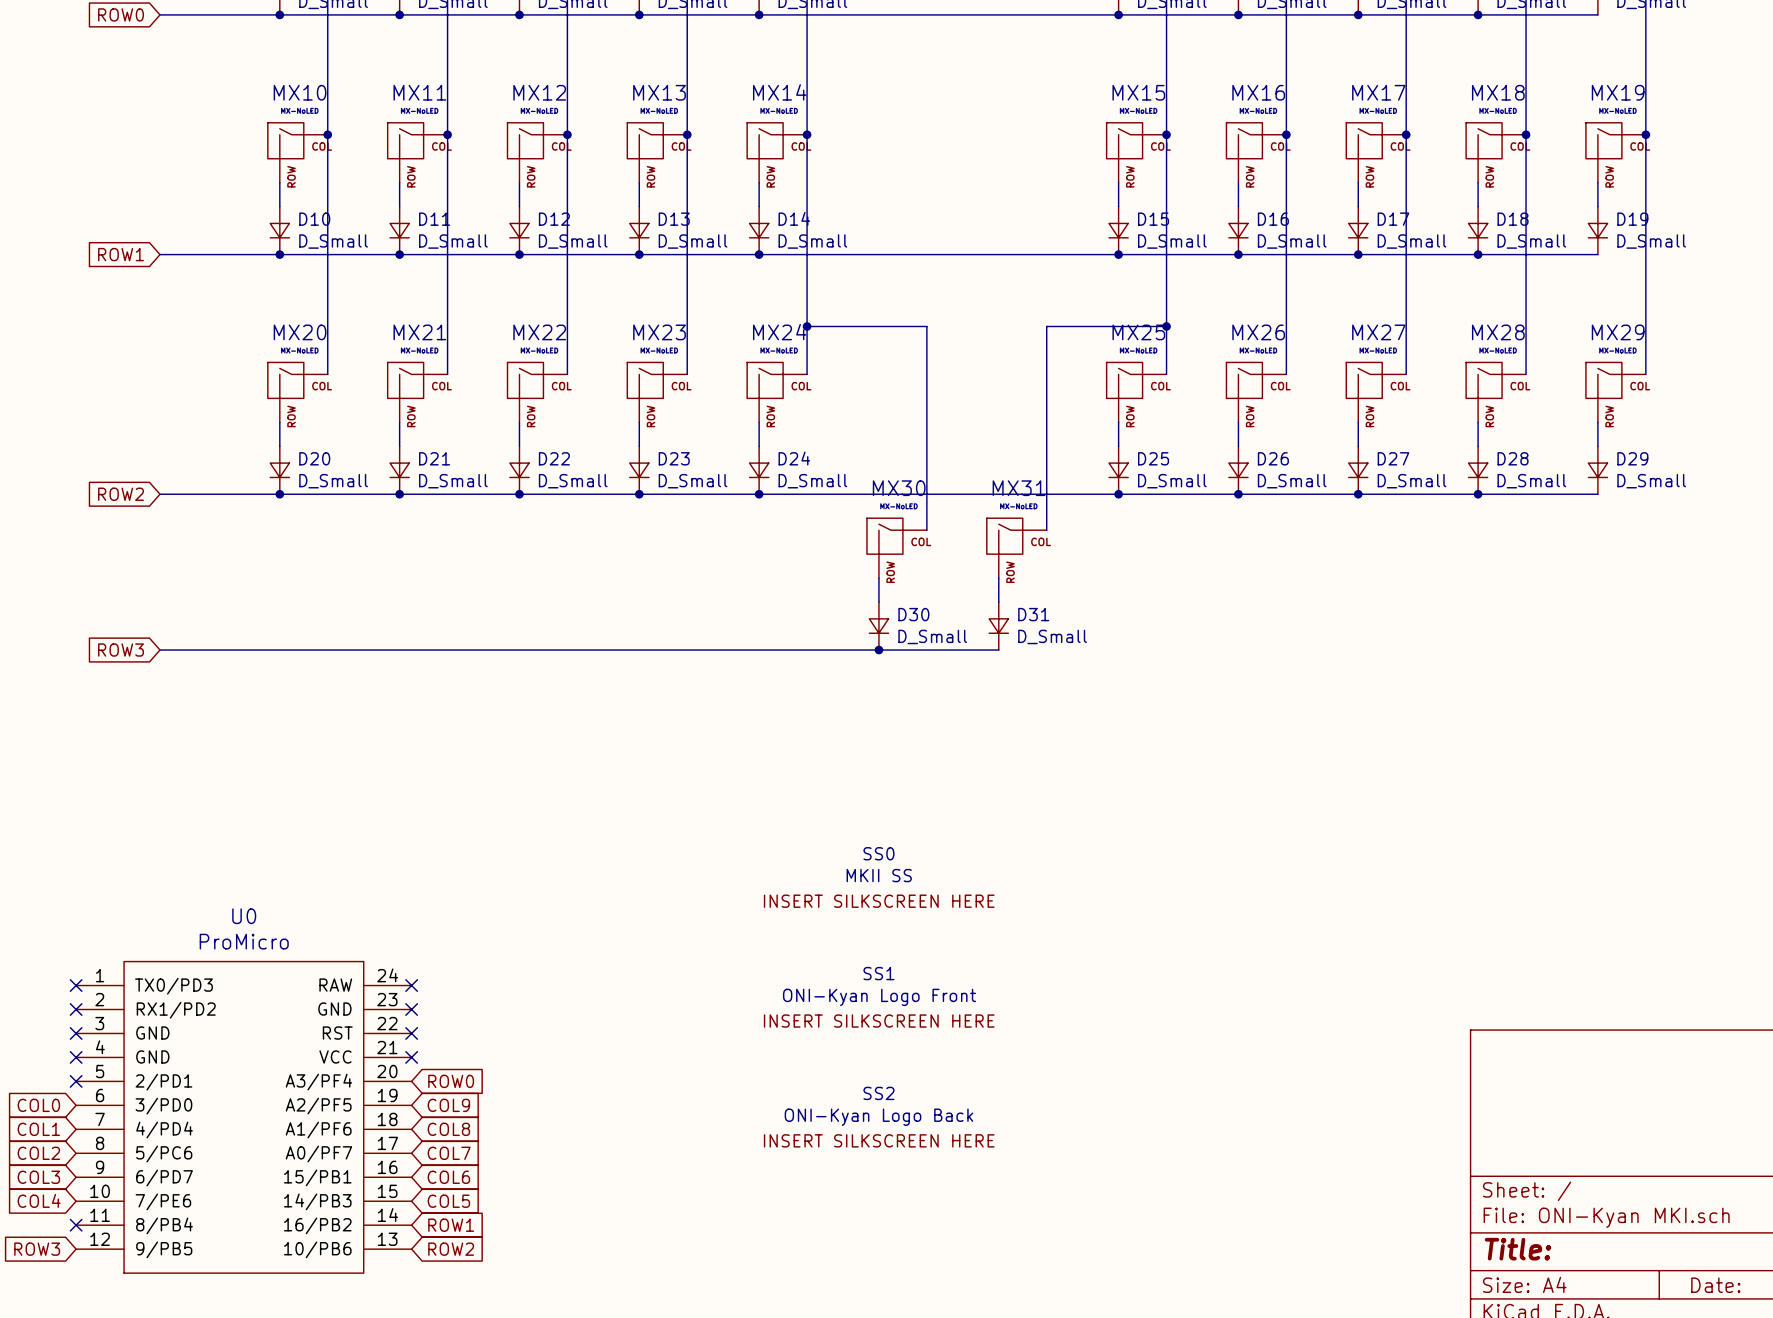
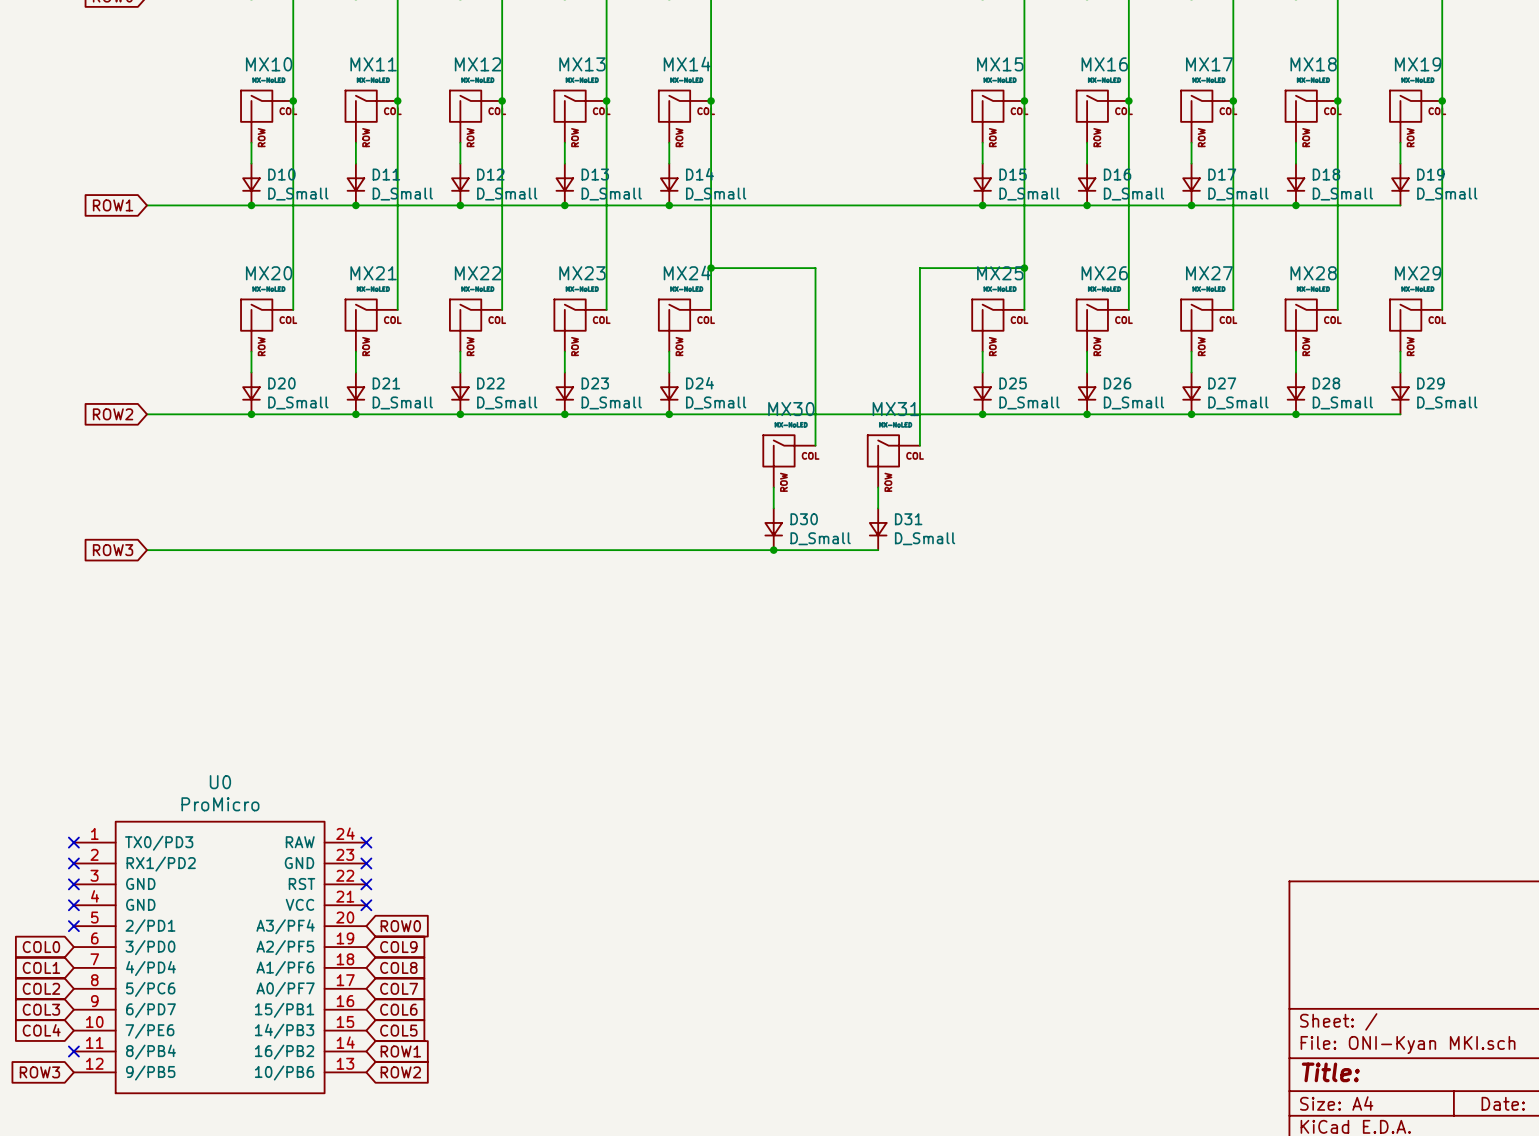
SS0: MKII SS (879, 877) -> none
SS1: ONI-Kyan Logo Front (879, 997) -> none
SS2: ONI-Kyan Logo Back (879, 1117) -> none

